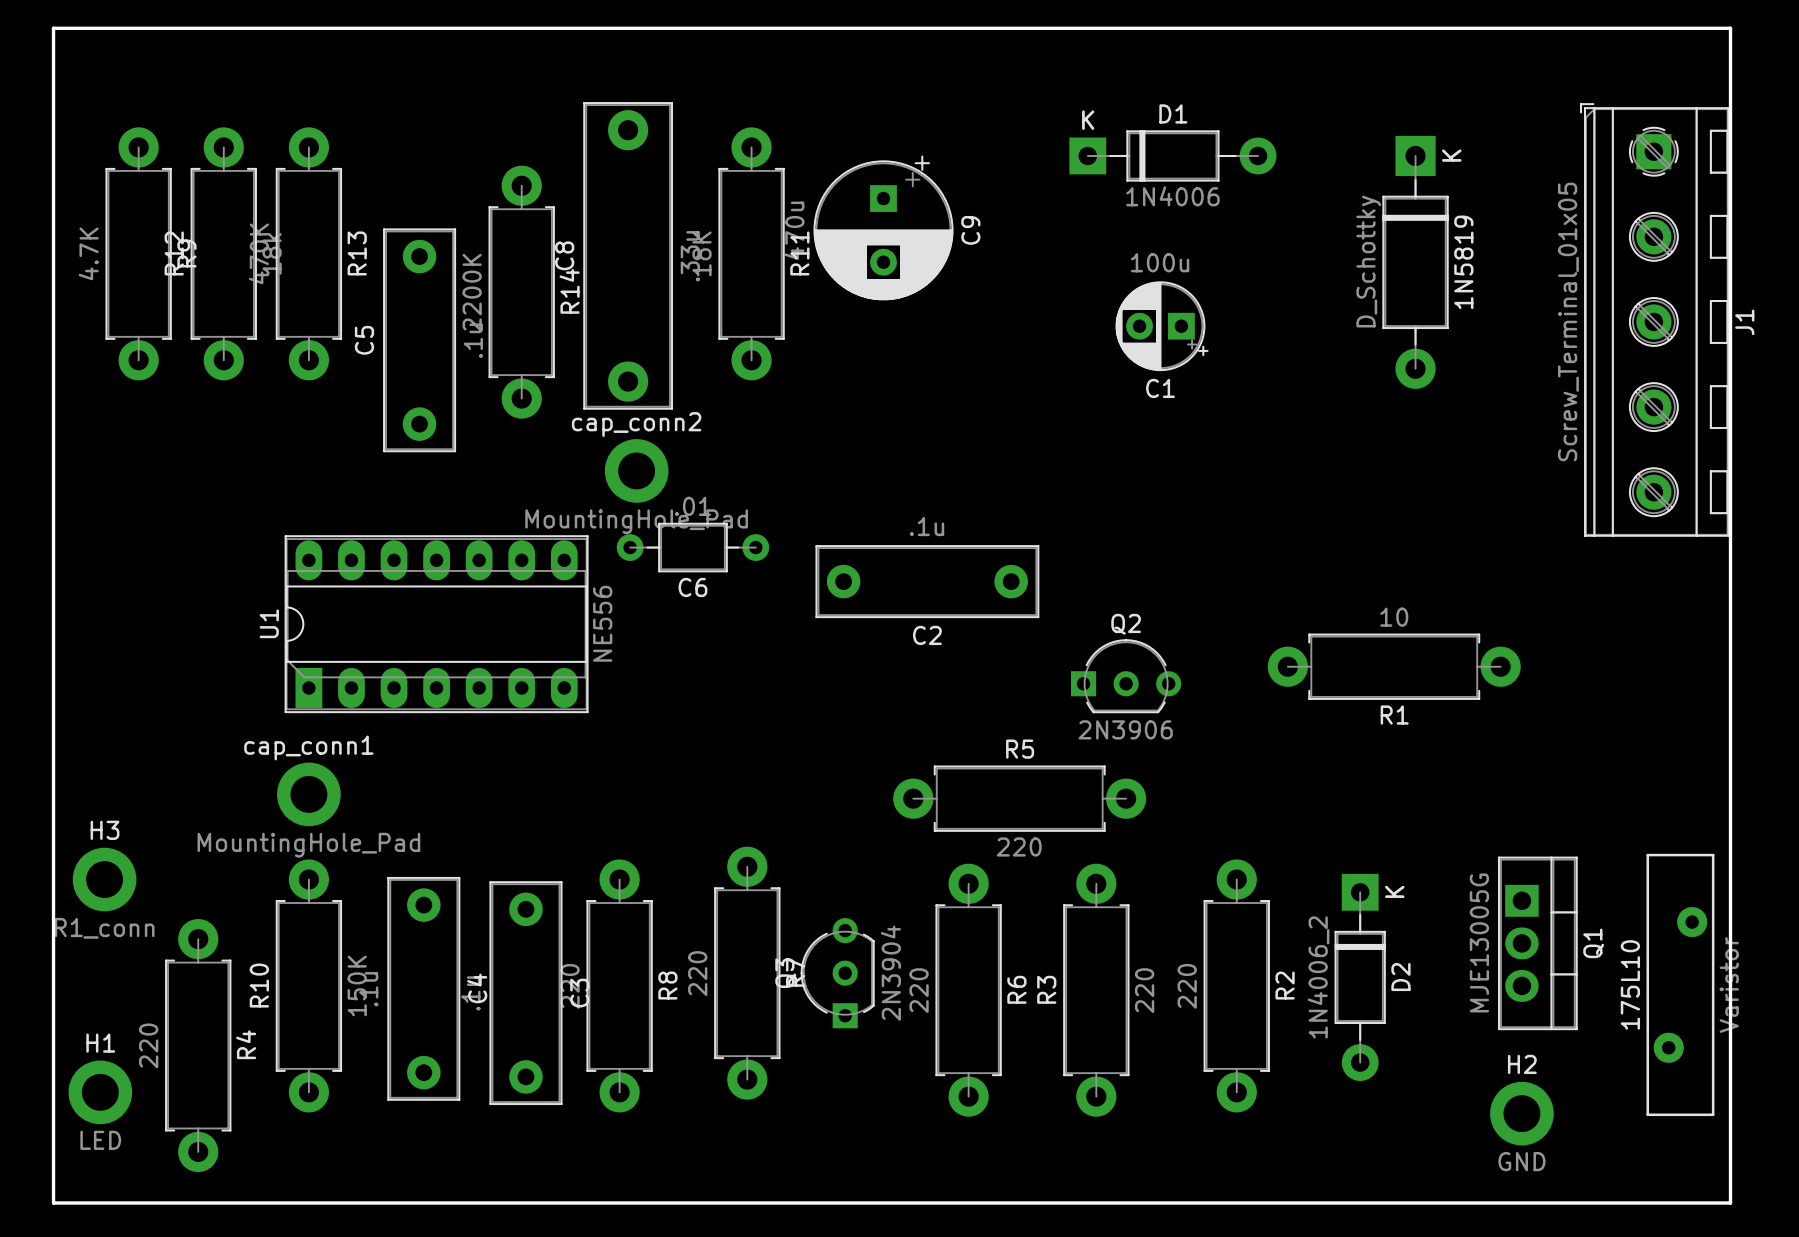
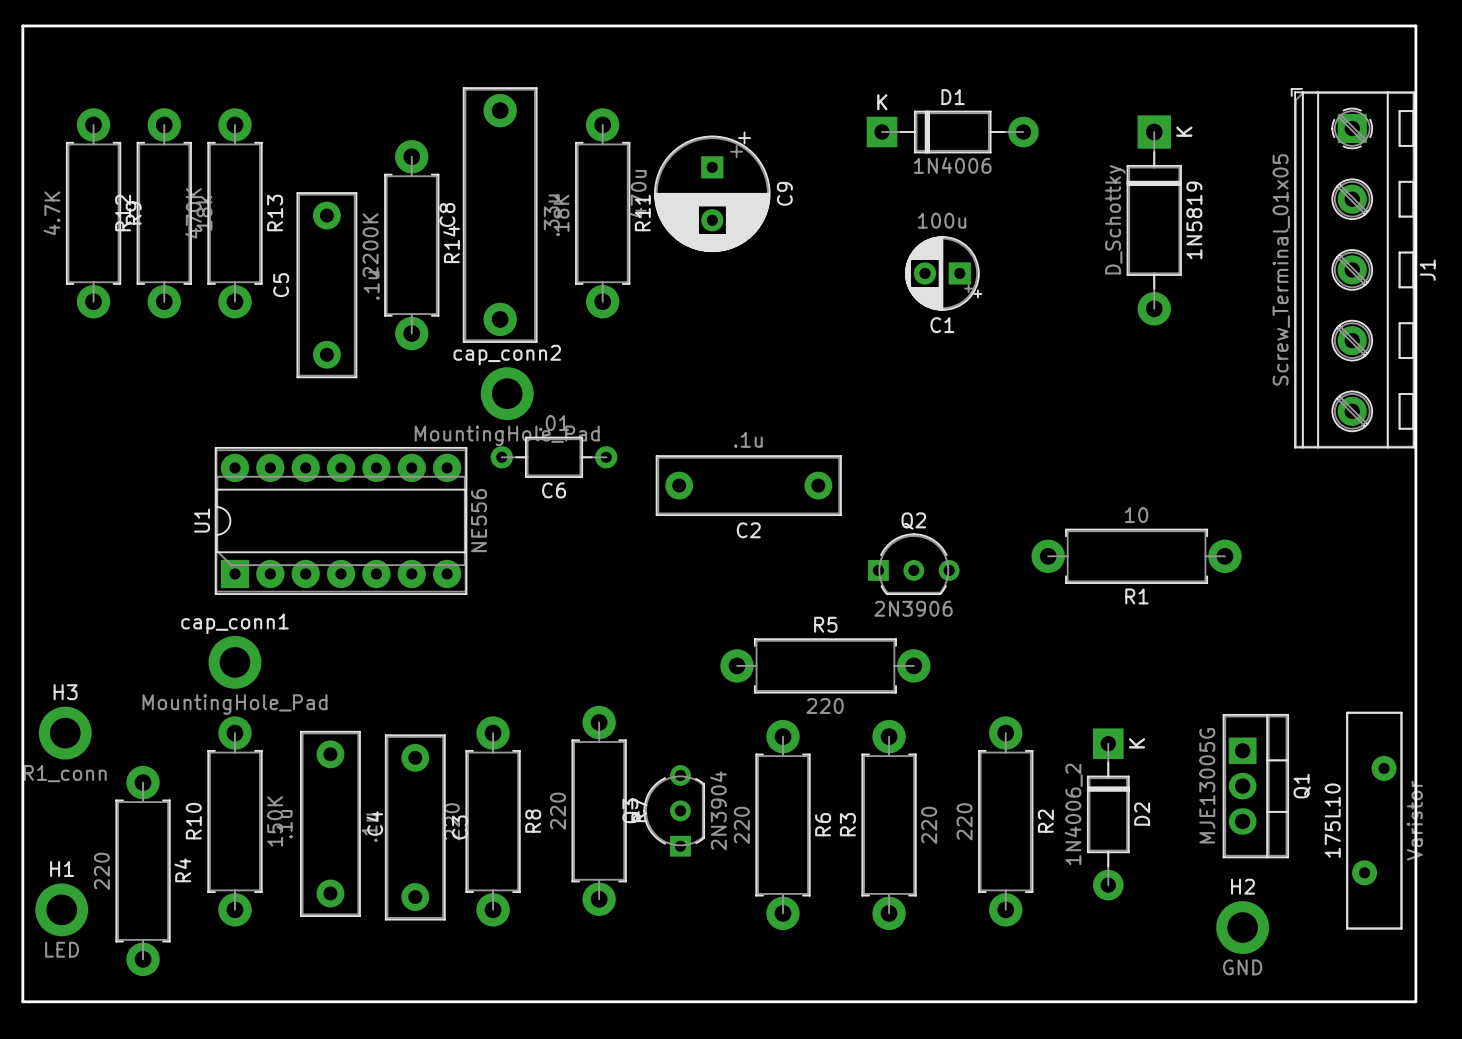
U1 footprint: [284, 535, 589, 714] -> [214, 447, 468, 595]

